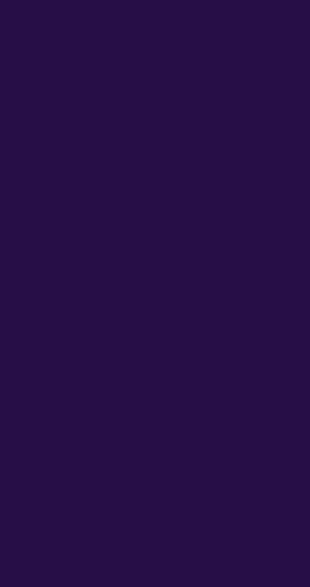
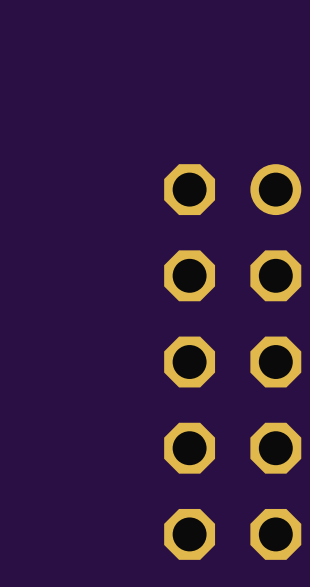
part: none -> (232, 362)

